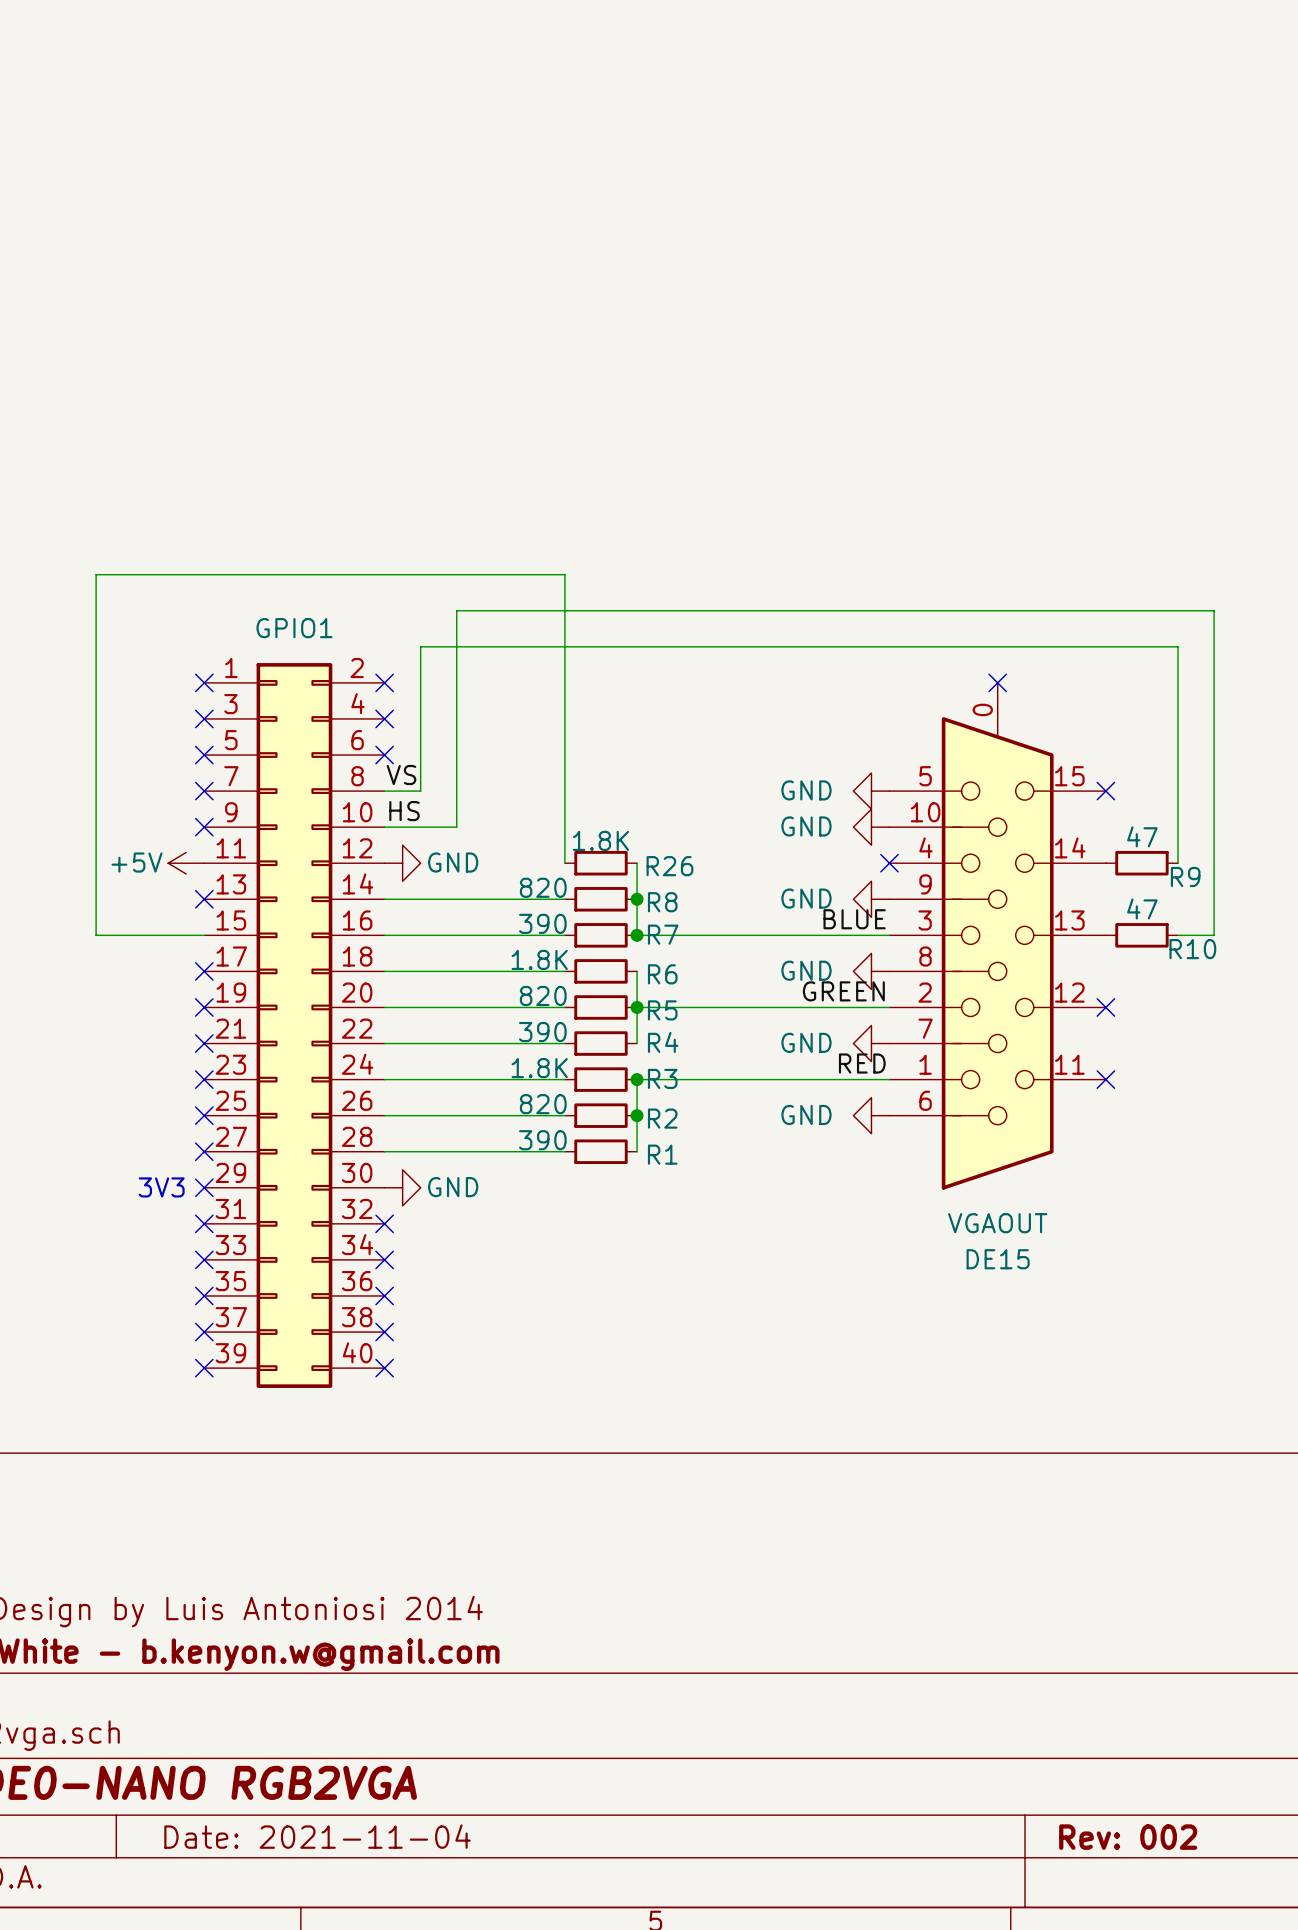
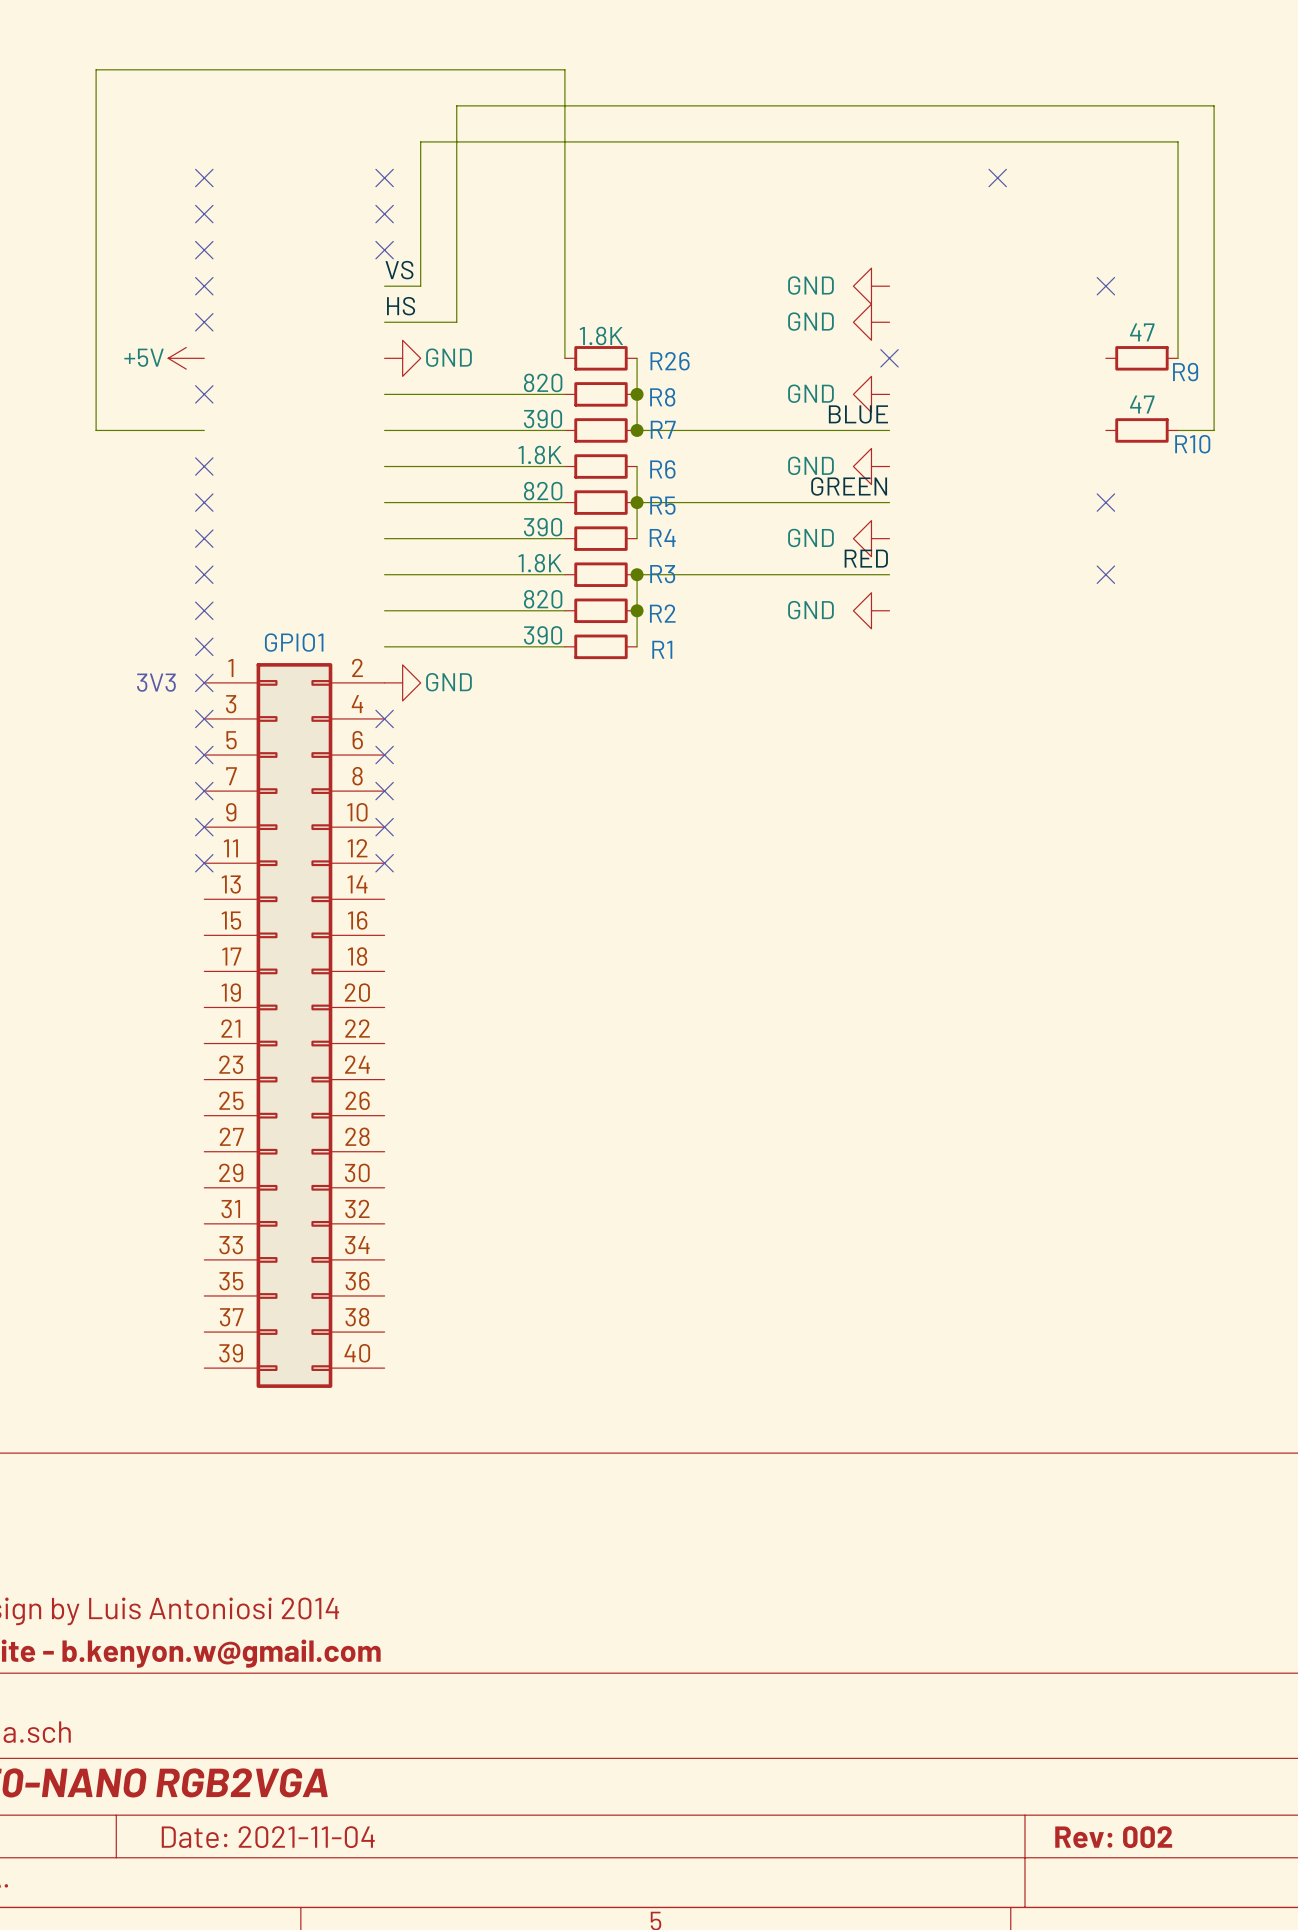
no-connect mark: none -> (204, 178)
no-connect mark: none -> (384, 178)
no-connect mark: none -> (997, 178)
no-connect mark: none -> (204, 214)
no-connect mark: none -> (384, 214)
no-connect mark: none -> (204, 250)
no-connect mark: none -> (384, 250)
label: none -> VS (399, 270)
no-connect mark: none -> (204, 286)
wire: none -> (384, 286) (420, 286) (420, 141) (1178, 141) (1178, 358)
power symbol: none -> GND (871, 286)
no-connect mark: none -> (1105, 286)
label: none -> HS (401, 306)
no-connect mark: none -> (204, 322)
wire: none -> (384, 322) (456, 322) (456, 105) (1214, 105) (1214, 430) (1178, 430)
power symbol: none -> GND (871, 322)
power symbol: none -> +5V (186, 358)
power symbol: none -> GND (402, 358)
wire: none -> (564, 358) (564, 69) (96, 69) (96, 430) (204, 430)
wire: none -> (637, 358) (637, 430) (889, 430)
no-connect mark: none -> (889, 358)
no-connect mark: none -> (204, 394)
wire: none -> (384, 394) (564, 394)
junction: none -> (637, 394)
power symbol: none -> GND (871, 394)
label: none -> BLUE (858, 414)
wire: none -> (384, 430) (564, 430)
junction: none -> (637, 430)
no-connect mark: none -> (204, 466)
wire: none -> (384, 466) (564, 466)
wire: none -> (637, 466) (637, 538)
power symbol: none -> GND (871, 466)
label: none -> GREEN (849, 486)
no-connect mark: none -> (204, 502)
wire: none -> (384, 502) (564, 502)
wire: none -> (637, 502) (889, 502)
junction: none -> (637, 502)
no-connect mark: none -> (1105, 502)
no-connect mark: none -> (204, 538)
wire: none -> (384, 538) (564, 538)
power symbol: none -> GND (871, 538)
label: none -> RED (866, 558)
no-connect mark: none -> (204, 574)
wire: (384, 574) (96, 574) (96, 935) (204, 935) -> none
wire: (564, 574) (564, 863) -> none
junction: none -> (637, 574)
wire: none -> (889, 574) (637, 574) (637, 646)
no-connect mark: none -> (1105, 574)
no-connect mark: none -> (204, 610)
wire: (456, 610) (456, 827) (384, 827) -> (456, 610) (384, 610)
wire: (564, 610) (1214, 610) (1214, 935) (1178, 935) -> none
junction: none -> (637, 610)
power symbol: none -> GND (871, 610)
GPIO1 name position: GPIO1 (294, 628) -> GPIO1 (294, 642)
no-connect mark: none -> (204, 646)
wire: (420, 646) (420, 791) (384, 791) -> (420, 646) (384, 646)
wire: (564, 646) (1178, 646) (1178, 863) -> none
text: none -> 3V3 (156, 682)
no-connect mark: (384, 682) -> none
no-connect mark: (997, 682) -> none
label: VS (401, 775) -> none
no-connect mark: none -> (384, 791)
power symbol: GND (871, 791) -> none
no-connect mark: (1105, 791) -> none
label: HS (404, 811) -> none
no-connect mark: none -> (384, 827)
power symbol: GND (871, 827) -> none
power symbol: +5V (186, 863) -> none
no-connect mark: none -> (384, 863)
power symbol position: GND (402, 863) -> GND (402, 682)
R26 position: (600, 863) -> (600, 358)
wire: (637, 863) (637, 935) (889, 935) -> none
no-connect mark: (889, 863) -> none
R9 position: (1141, 863) -> (1141, 358)
no-connect mark position: (204, 899) -> (204, 863)
wire: (384, 899) (564, 899) -> none
R8 position: (600, 899) -> (600, 394)
junction: (637, 899) -> none
power symbol: GND (871, 899) -> none
label: BLUE (854, 919) -> none
wire: (384, 935) (564, 935) -> none
R7 position: (600, 935) -> (600, 430)
junction: (637, 935) -> none
R10 position: (1141, 935) -> (1141, 430)
VGAOUT: DE15 (997, 936) -> none
no-connect mark: (204, 971) -> none
wire: (384, 971) (564, 971) -> none
R6 position: (600, 971) -> (600, 466)
wire: (637, 971) (637, 1043) -> none
power symbol: GND (871, 971) -> none
label: GREEN (843, 991) -> none
no-connect mark: (204, 1007) -> none
wire: (384, 1007) (564, 1007) -> none
R5 position: (600, 1007) -> (600, 502)
wire: (637, 1007) (889, 1007) -> none
junction: (637, 1007) -> none
no-connect mark: (1105, 1007) -> none
no-connect mark: (204, 1043) -> none
wire: (384, 1043) (564, 1043) -> none
R4 position: (600, 1043) -> (600, 538)
power symbol: GND (871, 1043) -> none
label: RED (862, 1063) -> none
no-connect mark: (204, 1079) -> none
wire: (384, 1079) (564, 1079) -> none
R3 position: (600, 1079) -> (600, 574)
junction: (637, 1079) -> none
wire: (889, 1079) (637, 1079) (637, 1151) -> none
no-connect mark: (1105, 1079) -> none
no-connect mark: (204, 1115) -> none
wire: (384, 1115) (564, 1115) -> none
R2 position: (600, 1115) -> (600, 610)
junction: (637, 1115) -> none
power symbol: GND (871, 1115) -> none
no-connect mark: (204, 1151) -> none
wire: (384, 1151) (564, 1151) -> none
R1 position: (600, 1151) -> (600, 646)
text: 3V3 (161, 1187) -> none
no-connect mark: (204, 1187) -> none
power symbol: GND (402, 1187) -> none
no-connect mark: (204, 1223) -> none
no-connect mark: (384, 1223) -> none
no-connect mark: (204, 1259) -> none
no-connect mark: (384, 1259) -> none
no-connect mark: (204, 1295) -> none
no-connect mark: (384, 1295) -> none
no-connect mark: (204, 1332) -> none
no-connect mark: (384, 1332) -> none
no-connect mark: (204, 1368) -> none
no-connect mark: (384, 1368) -> none

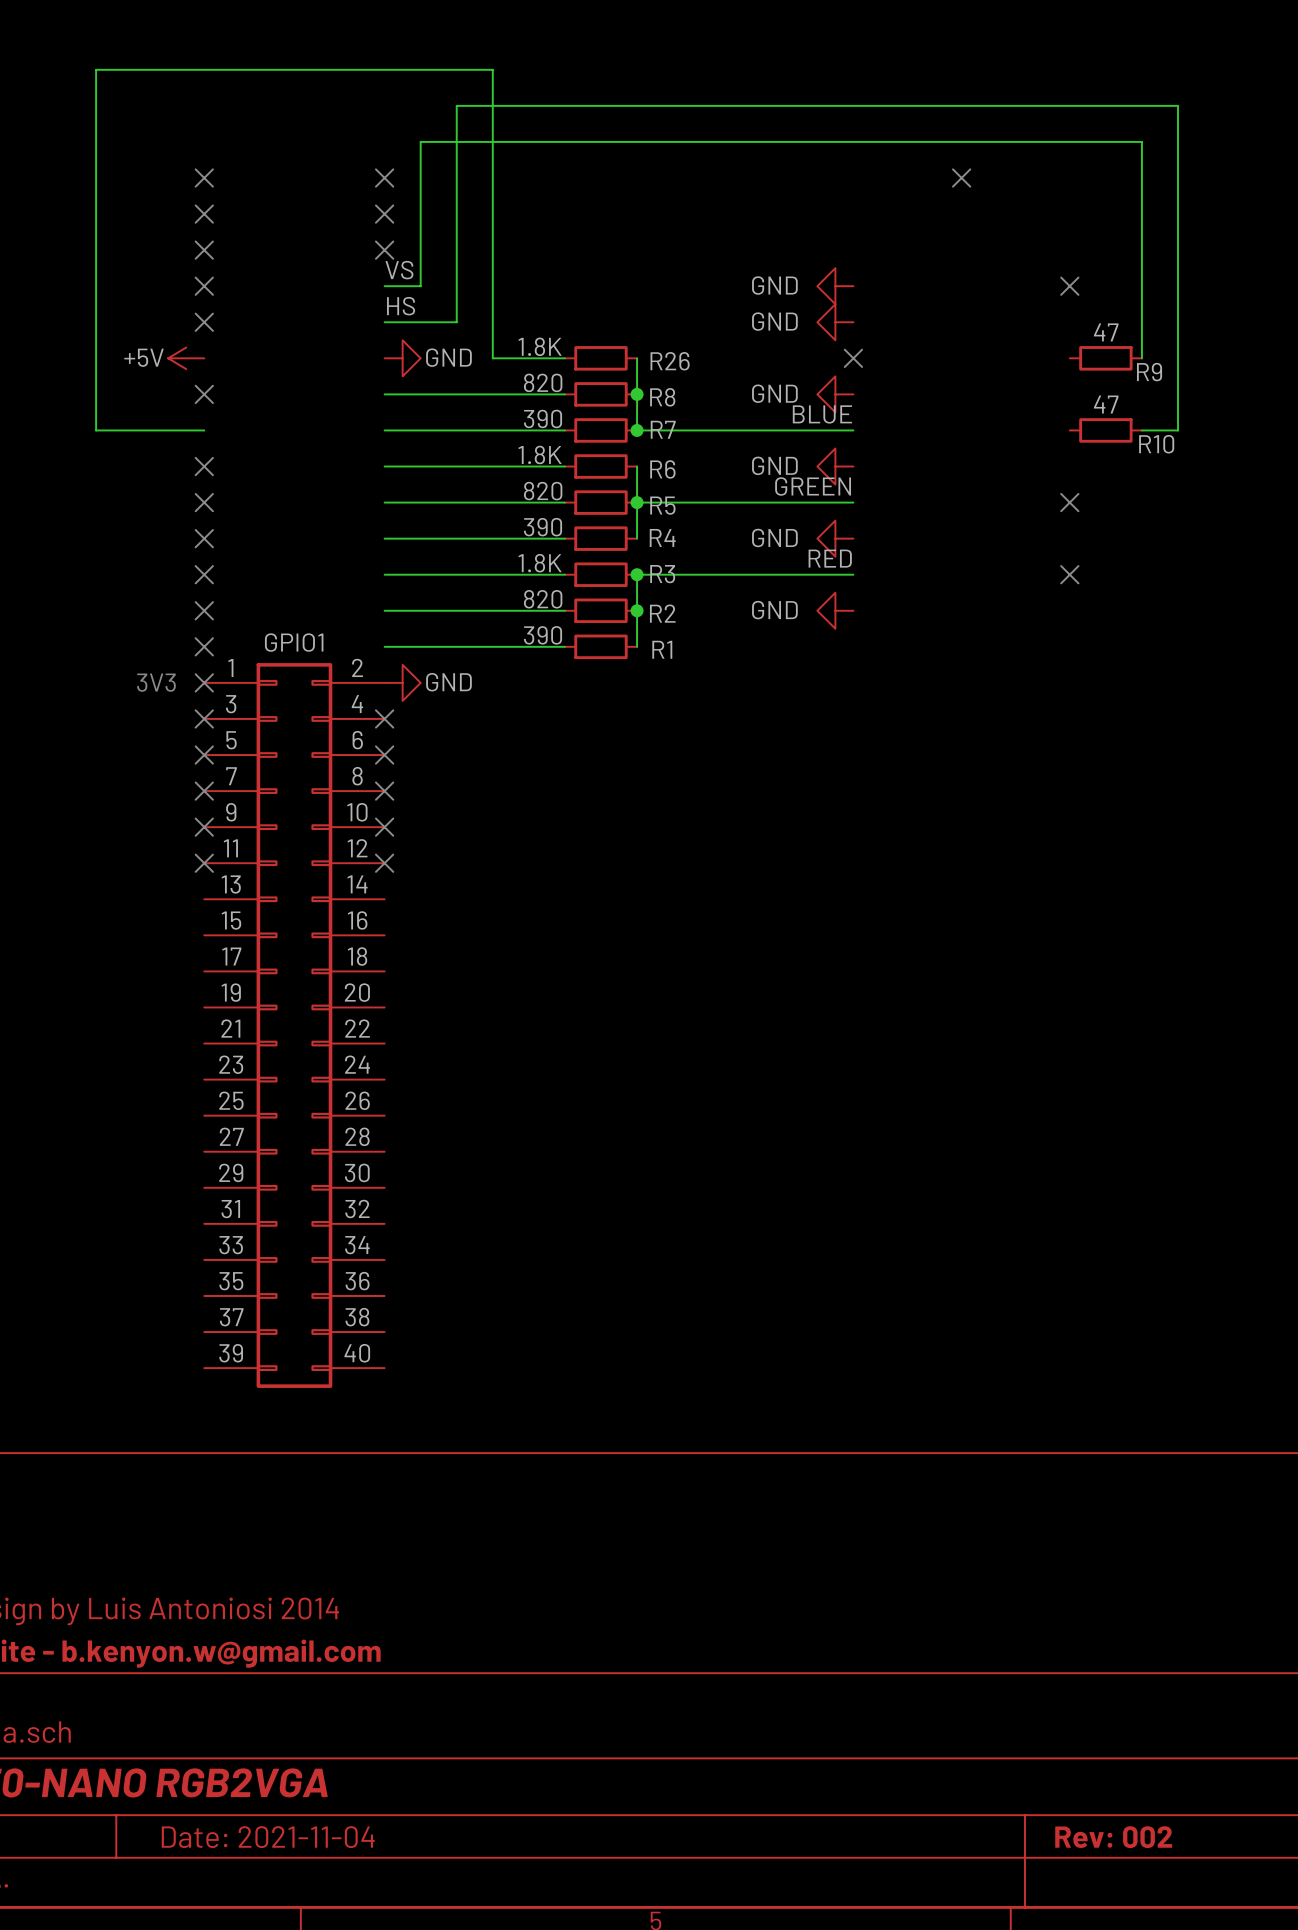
wire: (492, 69) (564, 69) (564, 358) -> (492, 69) (492, 358) (564, 358)
wire: (1178, 105) (1214, 105) (1214, 430) (1178, 430) -> none
wire: (1141, 141) (1178, 141) -> (1178, 105) (1178, 141)
wire: none -> (1141, 141) (1141, 358)
no-connect mark position: (997, 178) -> (961, 178)
power symbol: none -> GND (835, 286)
power symbol: GND (871, 286) -> none
no-connect mark position: (1105, 286) -> (1069, 286)
power symbol: none -> GND (835, 322)
power symbol: GND (871, 322) -> none
R26 value position: 1.8K (601, 335) -> 1.8K (540, 346)
no-connect mark position: (889, 358) -> (853, 358)
R9 position: (1141, 358) -> (1105, 358)
wire: none -> (1178, 358) (1178, 430) (1141, 430)
power symbol position: GND (871, 394) -> GND (835, 394)
label position: BLUE (858, 414) -> BLUE (822, 414)
wire: (853, 430) (889, 430) -> none
R10 position: (1141, 430) -> (1105, 430)
power symbol position: GND (871, 466) -> GND (835, 466)
label position: GREEN (849, 486) -> GREEN (813, 486)
wire: (853, 502) (889, 502) -> none
no-connect mark position: (1105, 502) -> (1069, 502)
power symbol position: GND (871, 538) -> GND (835, 538)
label position: RED (866, 558) -> RED (830, 558)
wire: (853, 574) (889, 574) -> none
no-connect mark position: (1105, 574) -> (1069, 574)
power symbol position: GND (871, 610) -> GND (835, 610)

